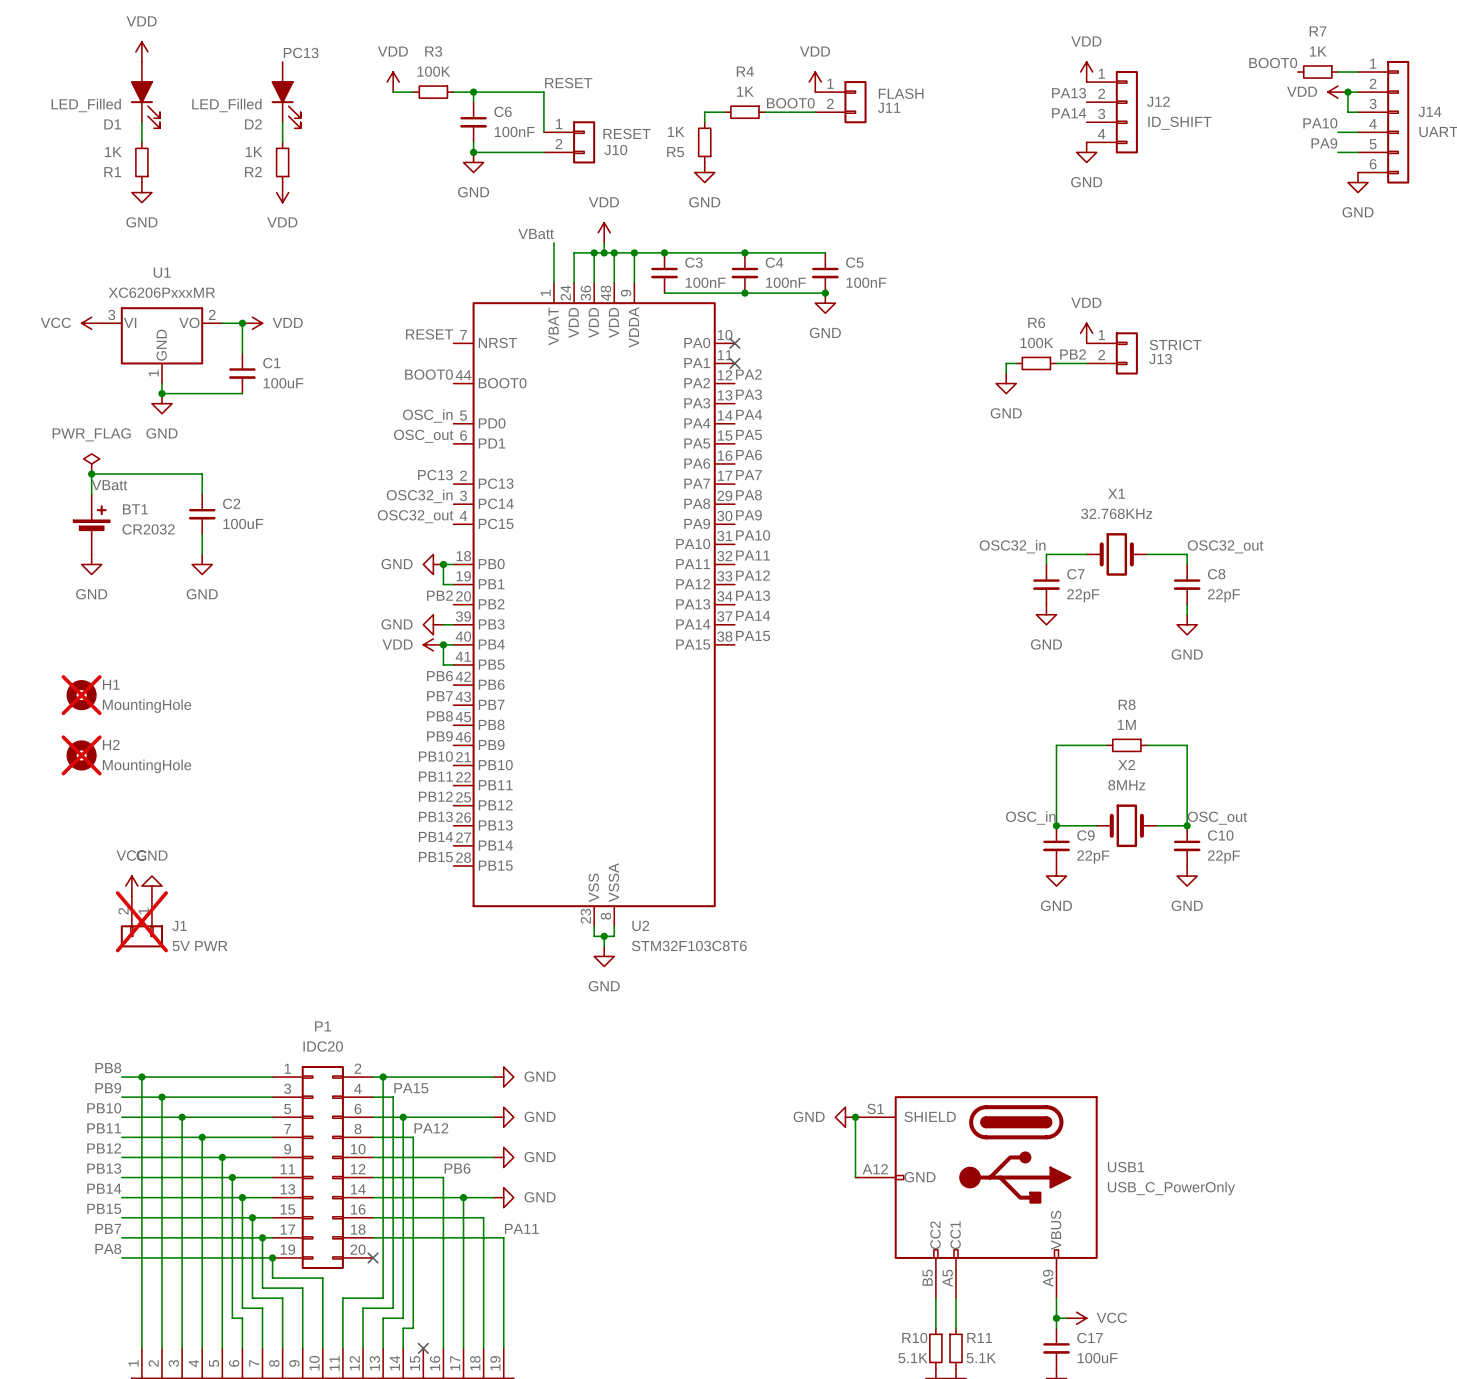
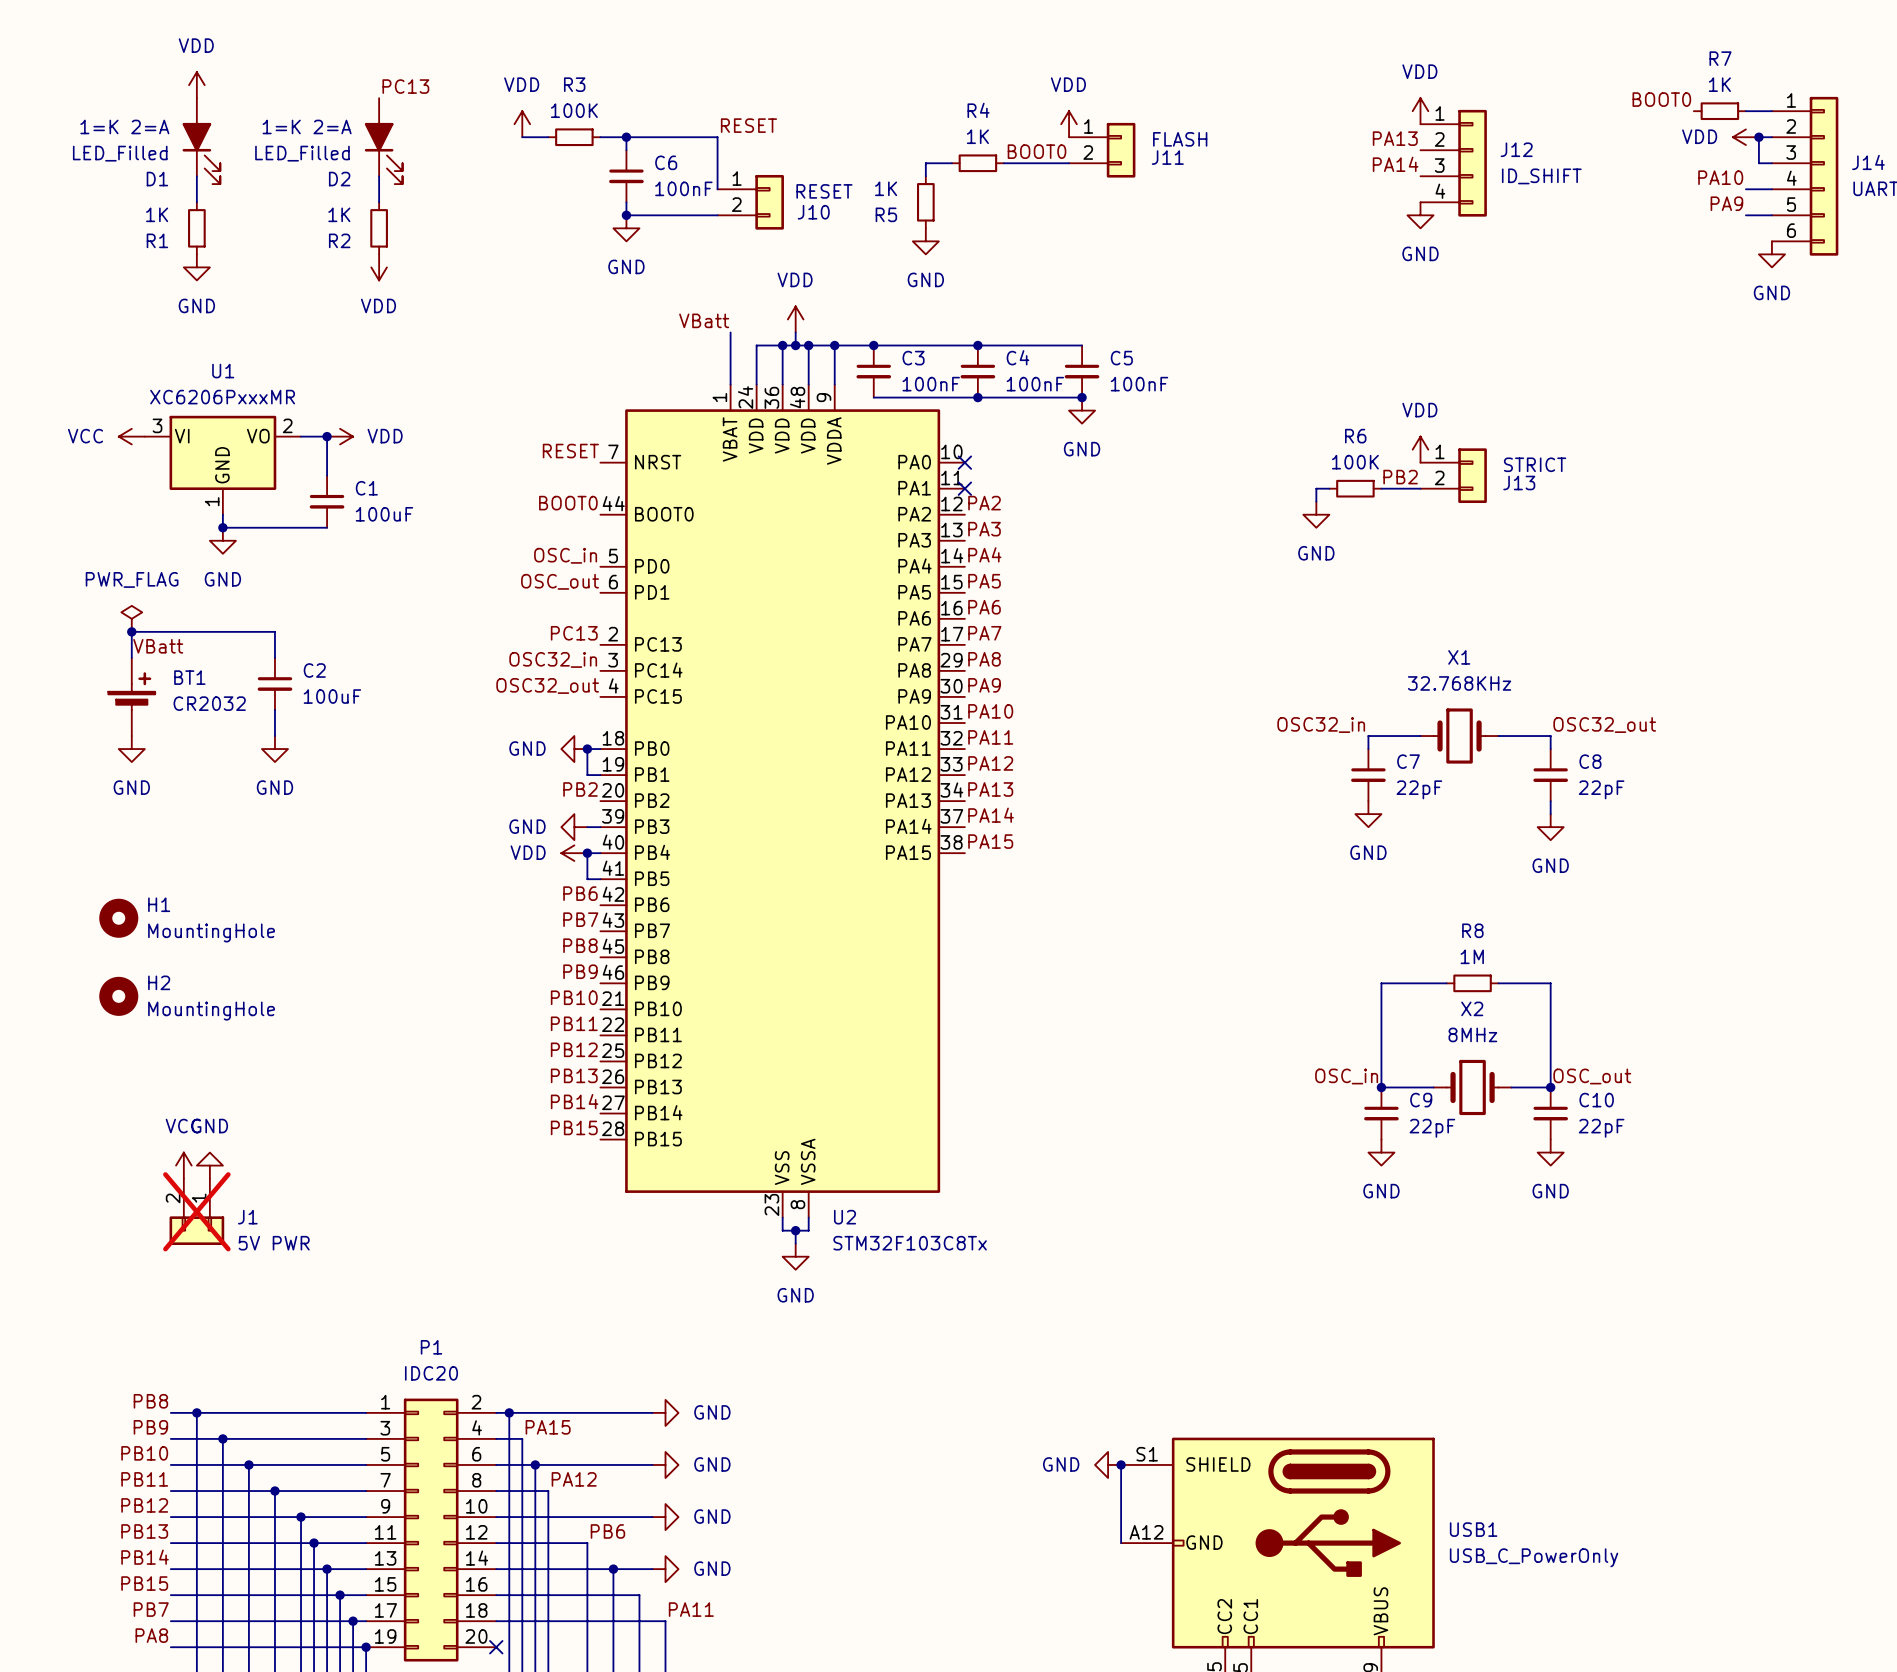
D1 text: none -> 1=K 2=A (124, 126)
D2 text: none -> 1=K 2=A (307, 126)
H1 do-not-place cross: (81, 695) -> none
H2 do-not-place cross: (81, 755) -> none
U2 value: STM32F103C8T6 (689, 946) -> STM32F103C8Tx (910, 1243)

